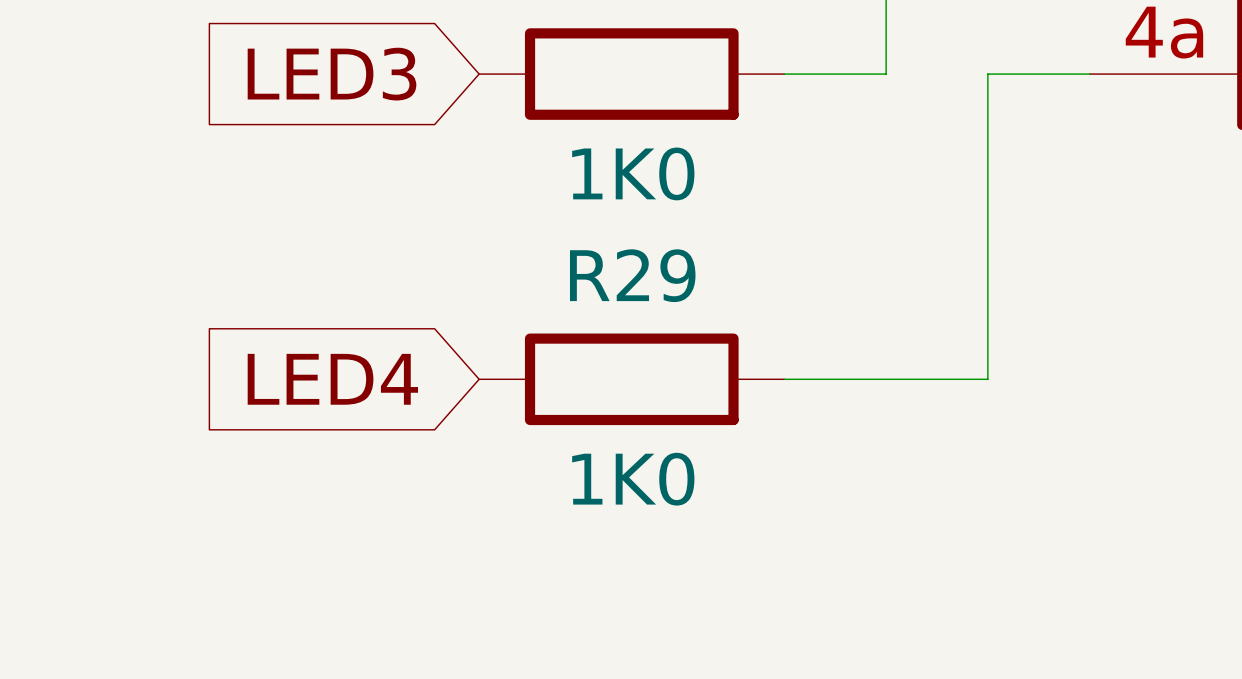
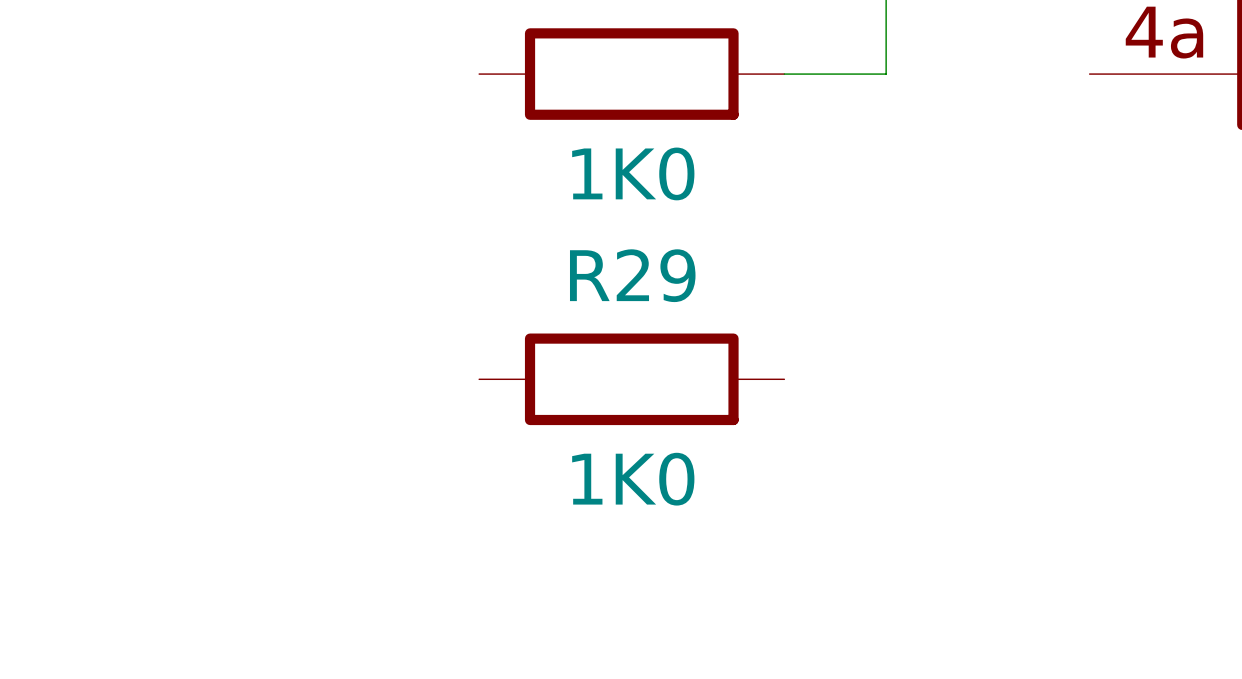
global label: LED3 (332, 74) -> none
wire: (1089, 74) (987, 74) (987, 379) (784, 379) -> none
global label: LED4 (332, 379) -> none

